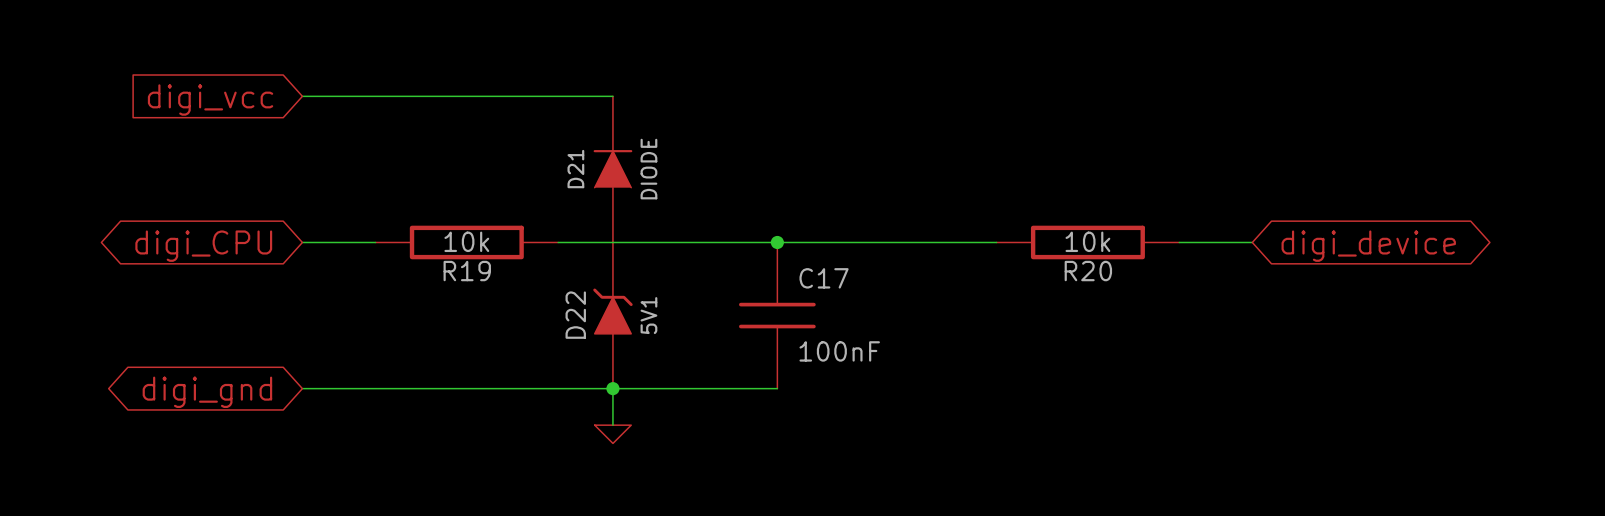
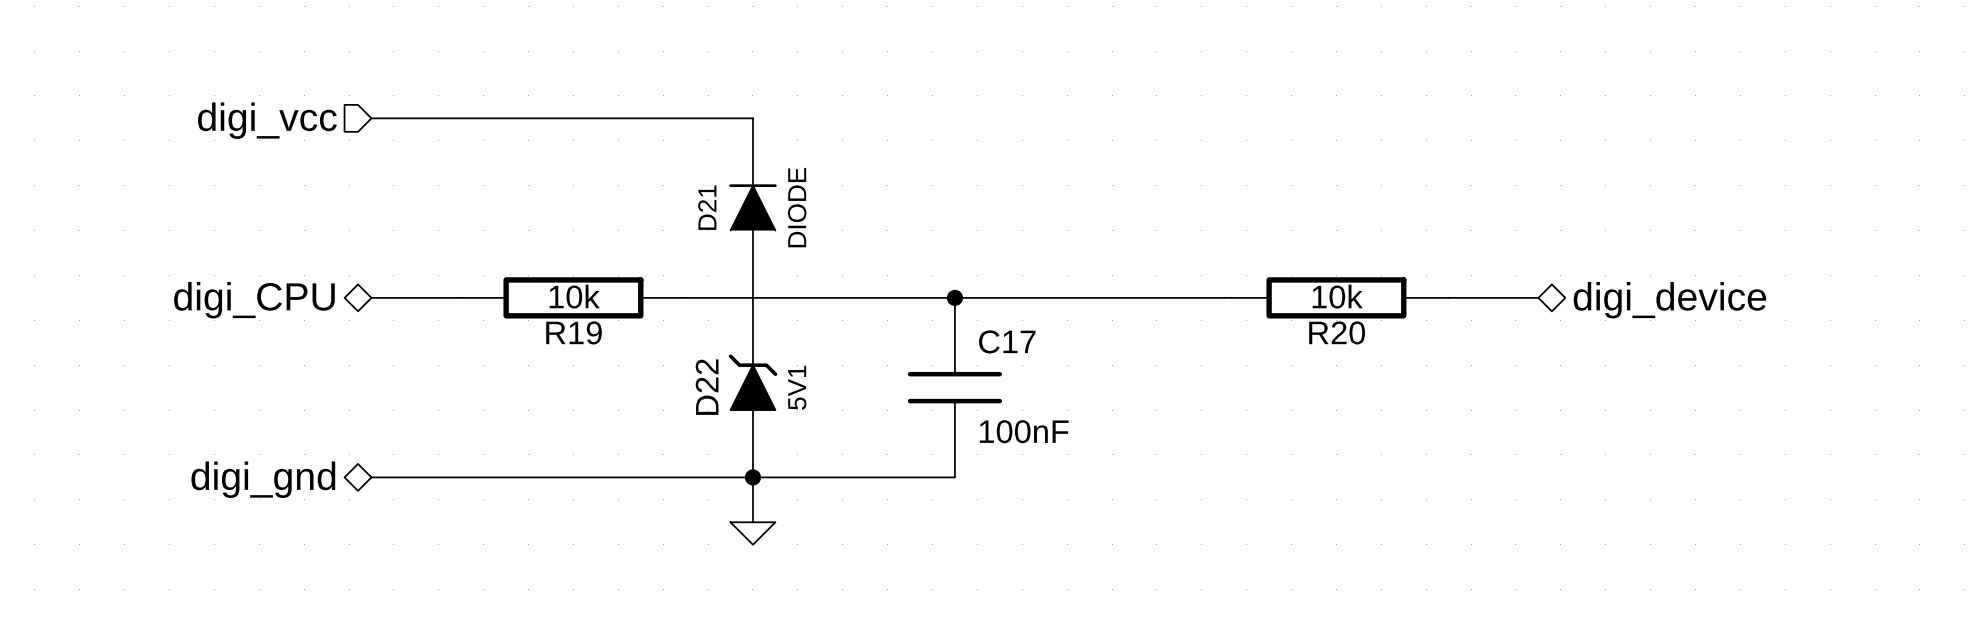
hierarchical label: none -> digi_vcc (267, 120)
global label: digi_vcc (210, 100) -> none
hierarchical label: none -> digi_CPU (254, 300)
hierarchical label: none -> digi_device (1669, 300)
global label: digi_CPU (203, 246) -> none
global label: digi_device (1368, 246) -> none
hierarchical label: none -> digi_gnd (263, 479)
global label: digi_gnd (207, 392) -> none

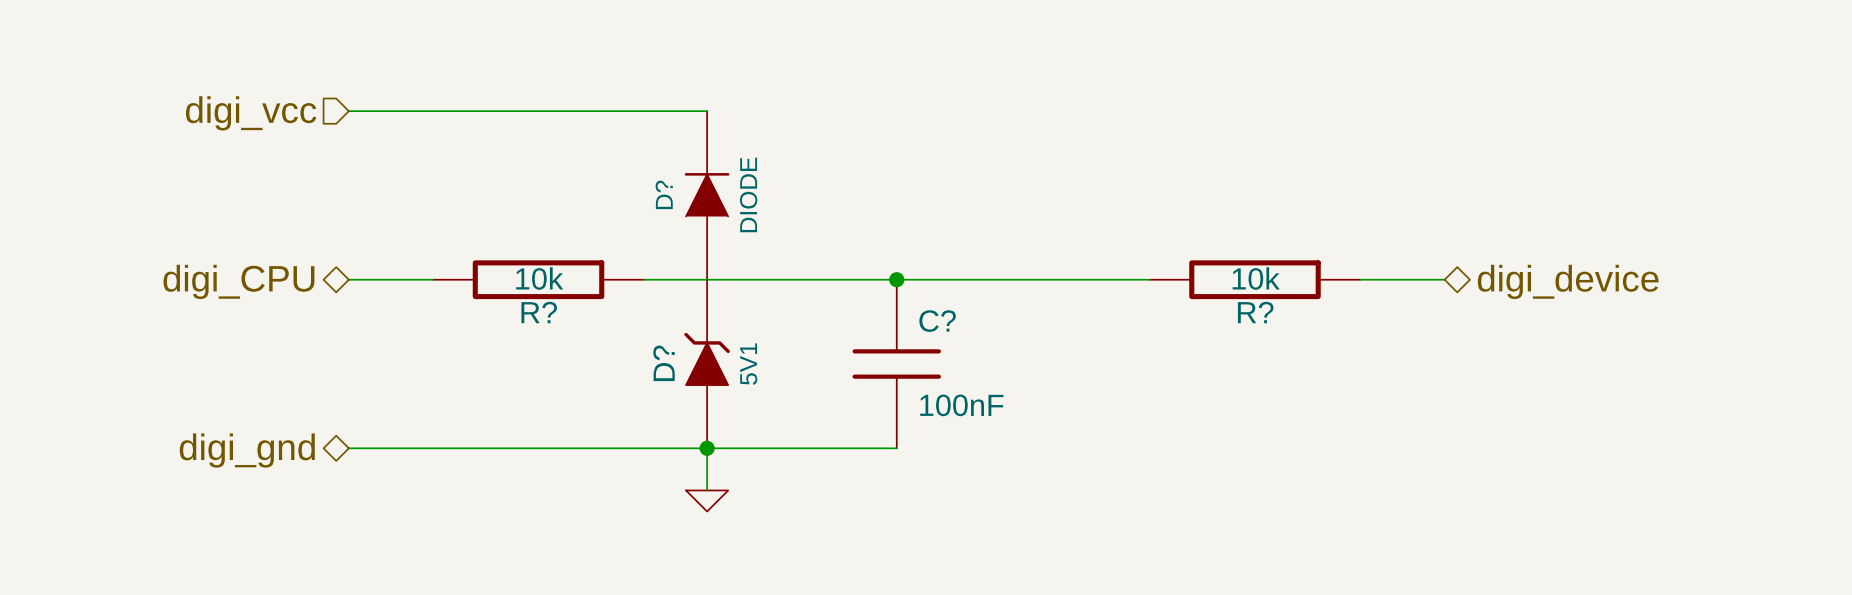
D21 name: D21 (707, 207) -> D? (664, 194)
R19 name: R19 (574, 332) -> R? (539, 312)
R20 name: R20 (1337, 332) -> R? (1255, 312)
C17 name: C17 (1007, 341) -> C? (937, 321)
D22 name: D22 (707, 387) -> D? (664, 363)

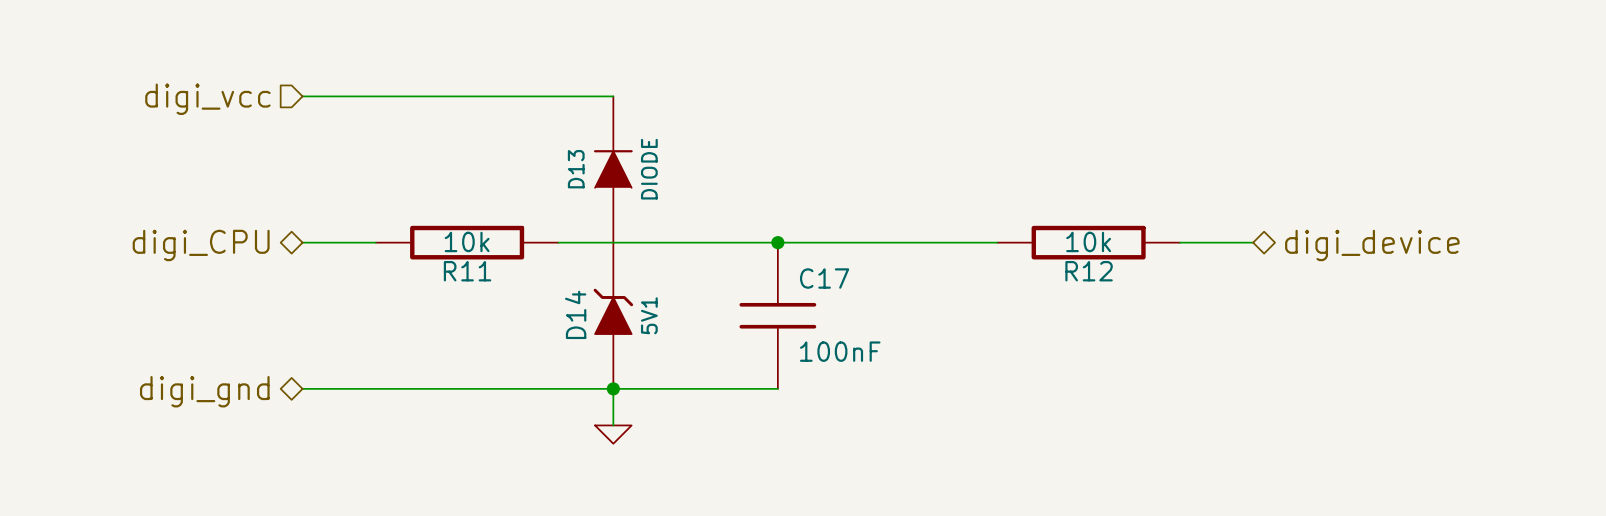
D? name: D? (664, 194) -> D13 (576, 169)
R? name: R? (539, 312) -> R11 (467, 271)
R? name: R? (1255, 312) -> R12 (1089, 271)
C? name: C? (937, 321) -> C17 (824, 278)
D? name: D? (664, 363) -> D14 (575, 314)

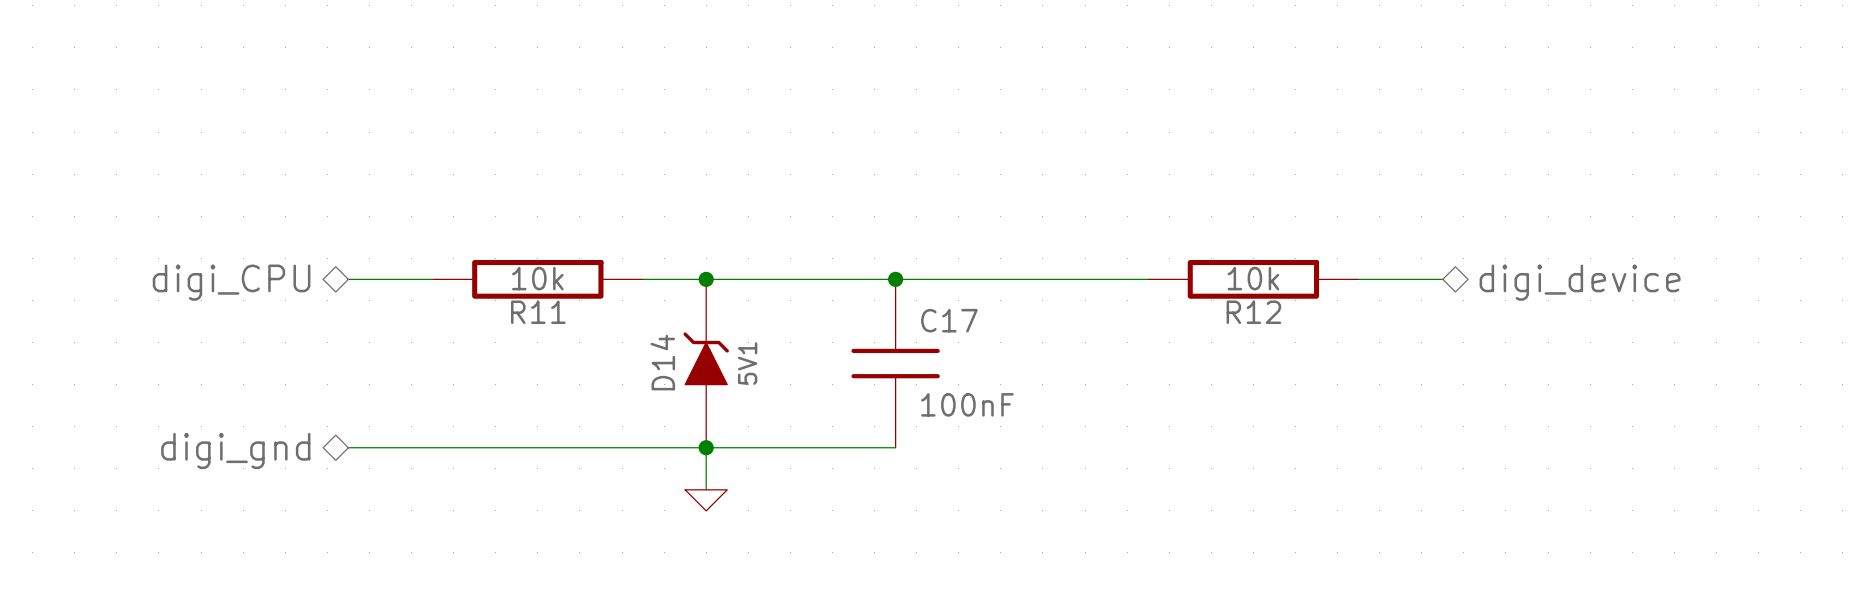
wire: (302, 96) (613, 96) -> none
hierarchical label: digi_vcc (207, 99) -> none
D13: DIODE (613, 169) -> none
junction: none -> (706, 279)

